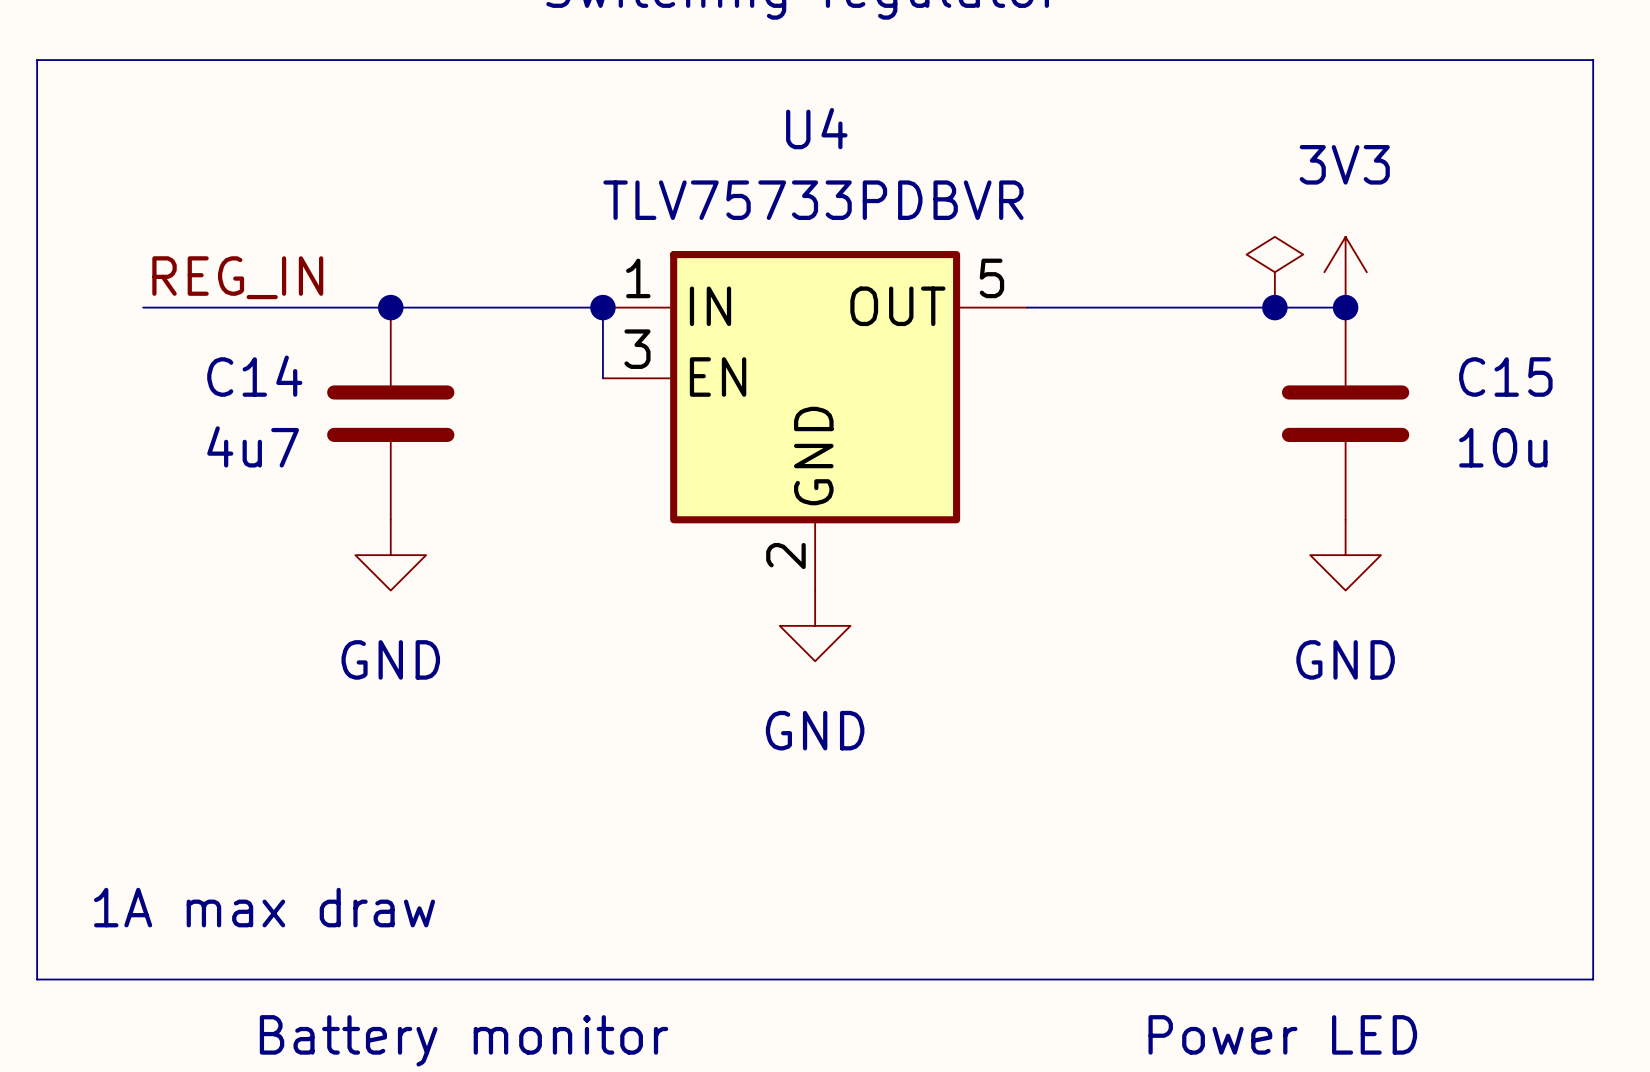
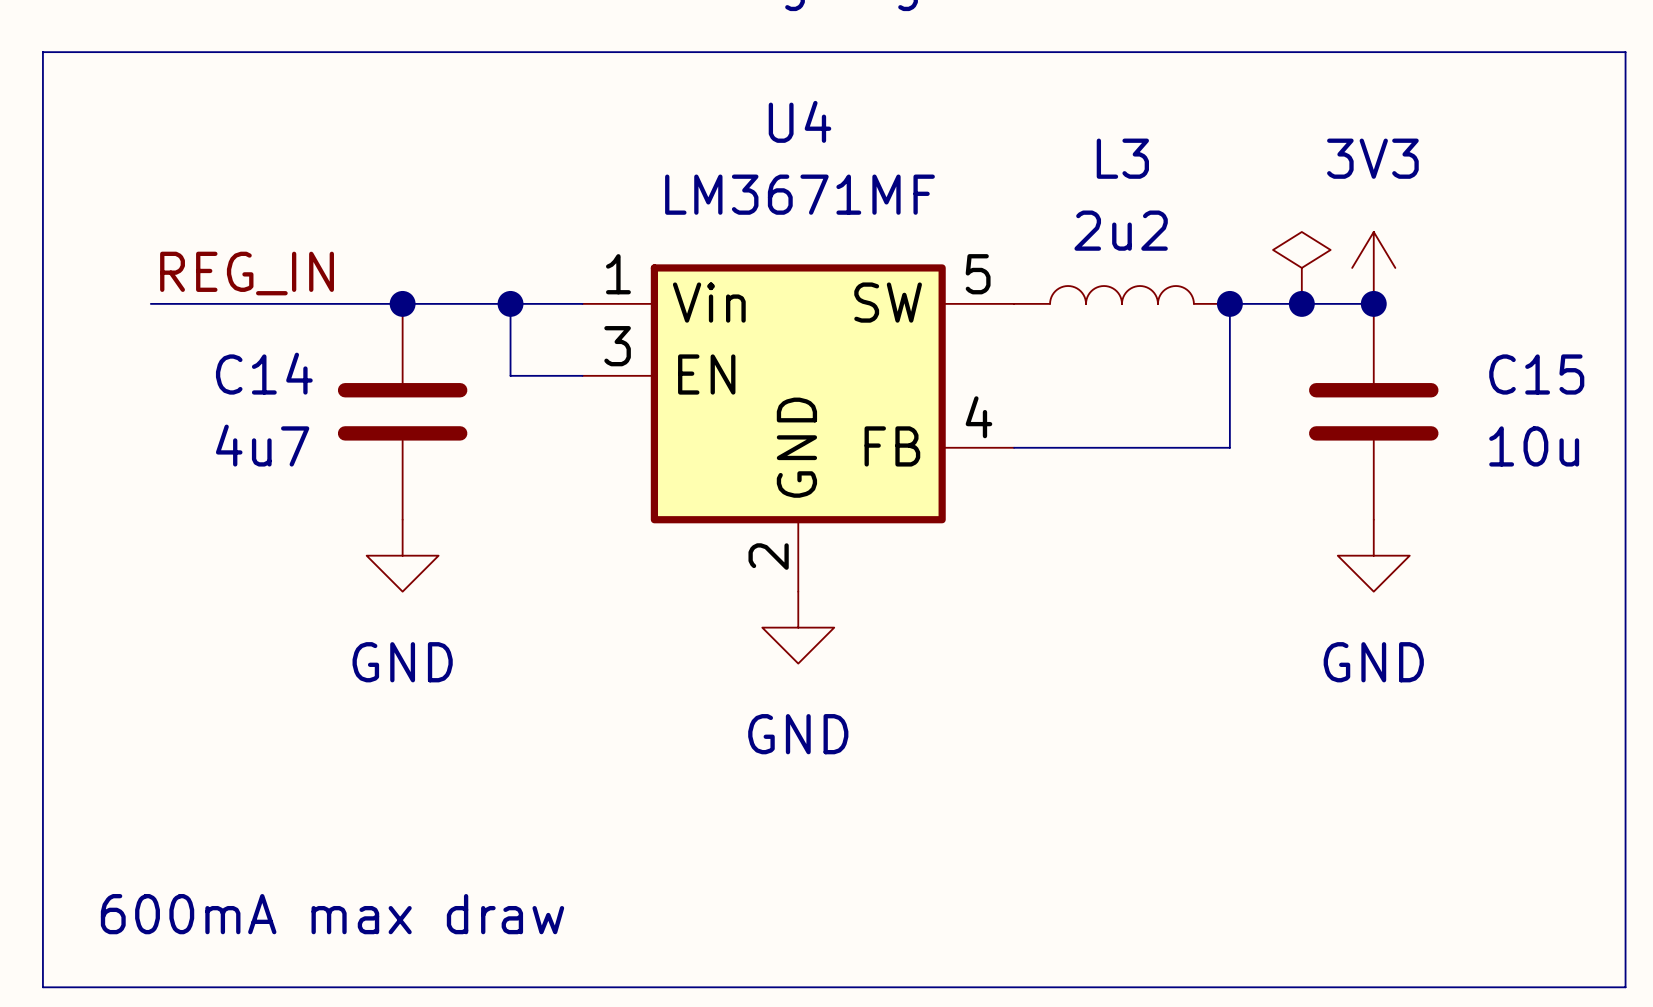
U4 value: TLV75733PDBVR (813, 200) -> LM3671MF (799, 194)
U4 symbol: [602, 251, 1028, 591] -> [582, 264, 1015, 592]
L3: none -> 2u2 (1121, 294)
wire: none -> (510, 303) (510, 375) (582, 375)
wire: (567, 307) (602, 307) (602, 378) -> none
junction position: (602, 307) -> (510, 303)
wire: (1027, 307) (1204, 307) -> (1014, 447) (1229, 447) (1229, 303)
junction: none -> (1229, 303)
power symbol position: GND (815, 625) -> GND (798, 627)
text: 1A max draw (264, 907) -> 600mA max draw (332, 914)

